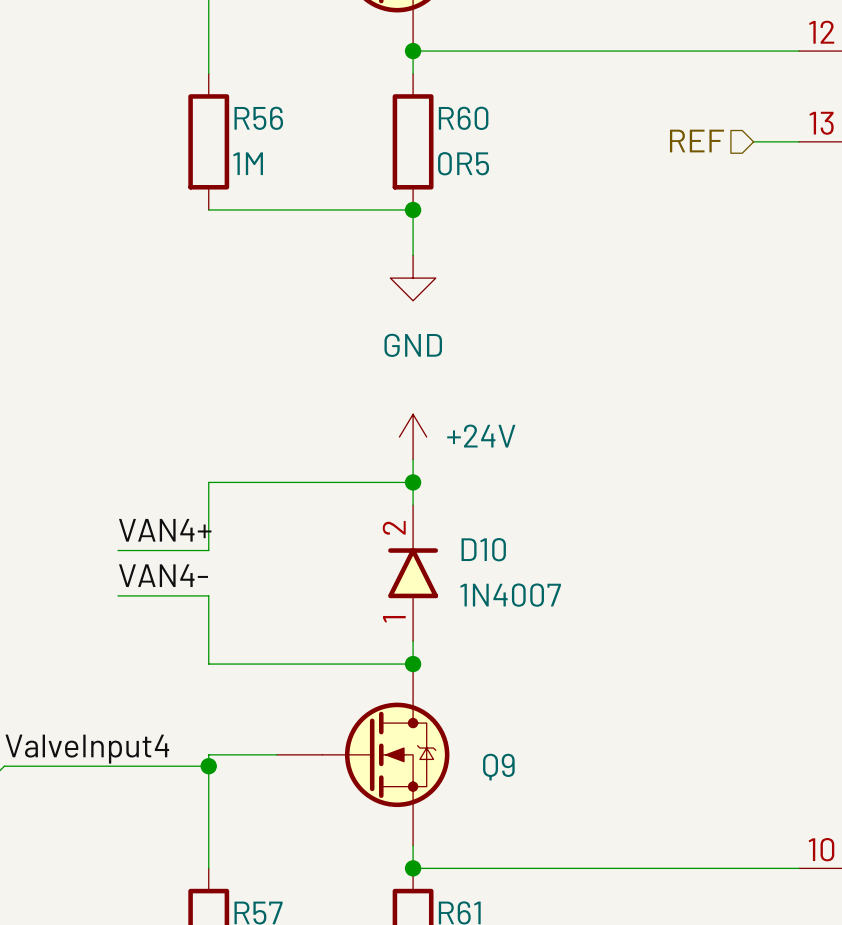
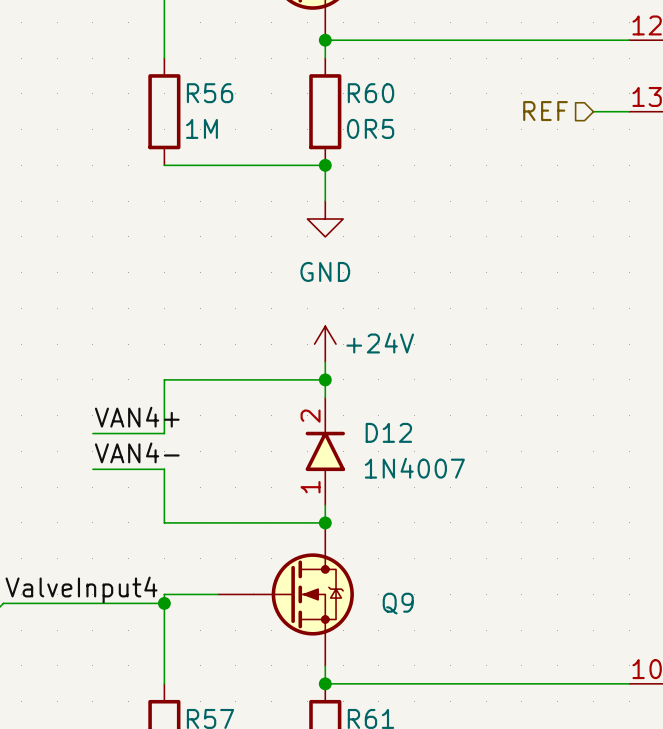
D10 name: D10 (483, 549) -> D12 (388, 432)

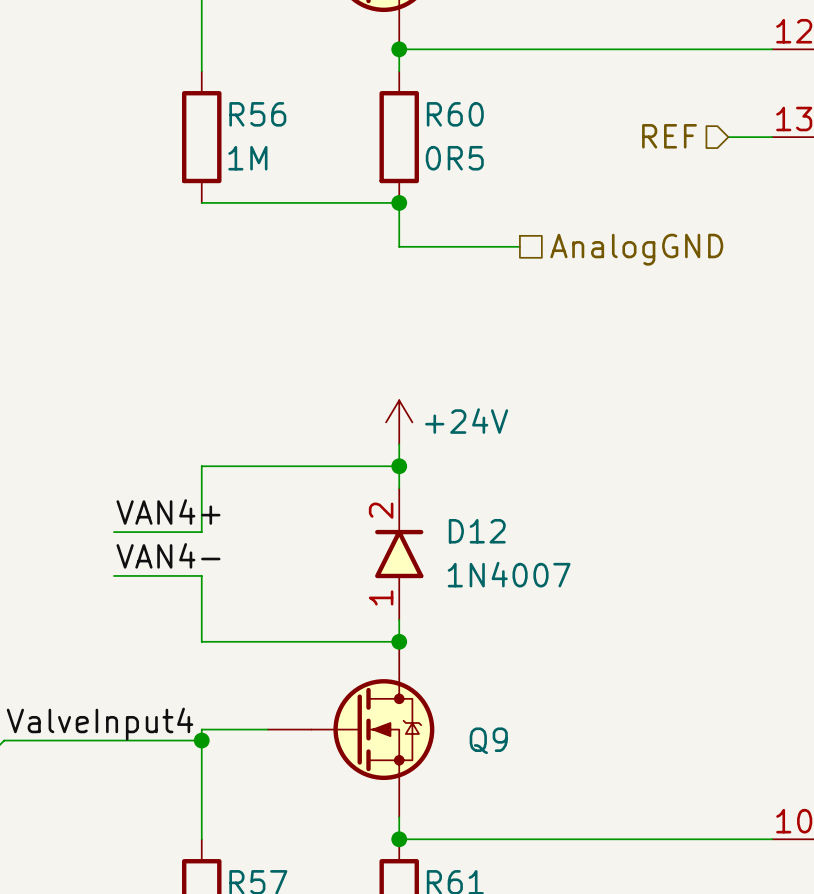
wire: none -> (399, 246) (519, 246)
hierarchical label: none -> AnalogGND (636, 249)
power symbol: GND (325, 218) -> none

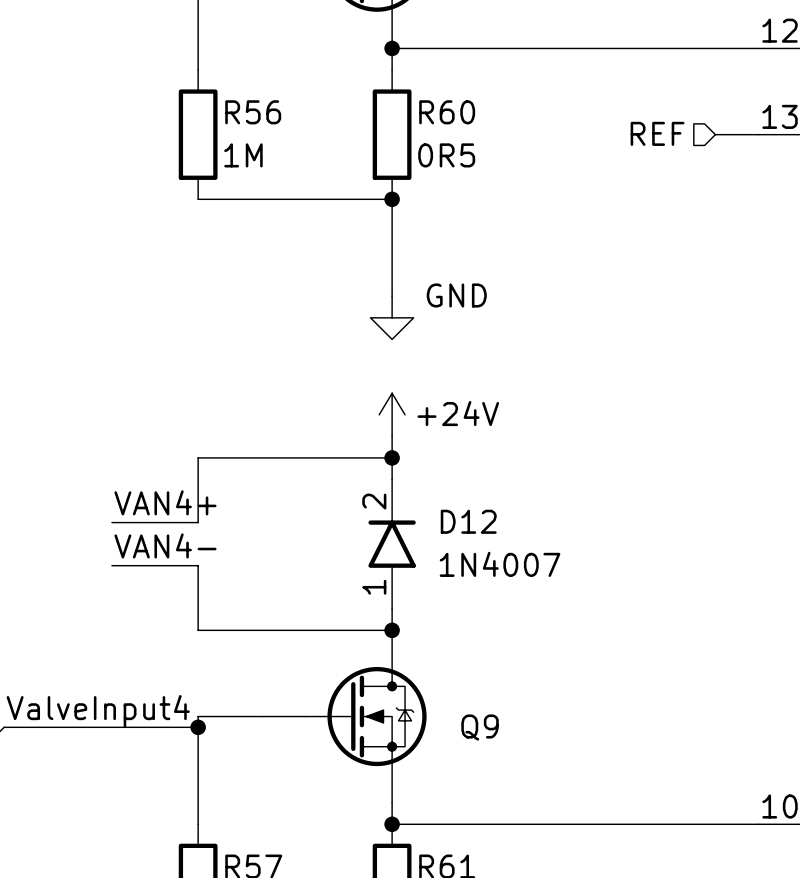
wire: (399, 246) (519, 246) -> (392, 242) (392, 296)
hierarchical label: AnalogGND (636, 249) -> none
power symbol: none -> GND (392, 317)

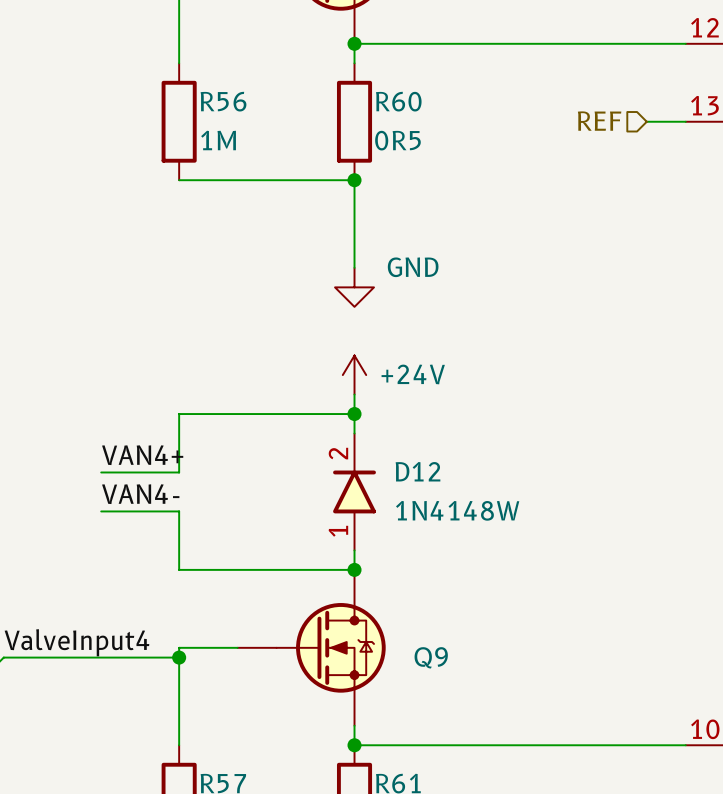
D12 value: 1N4007 (500, 564) -> 1N4148W (457, 510)

